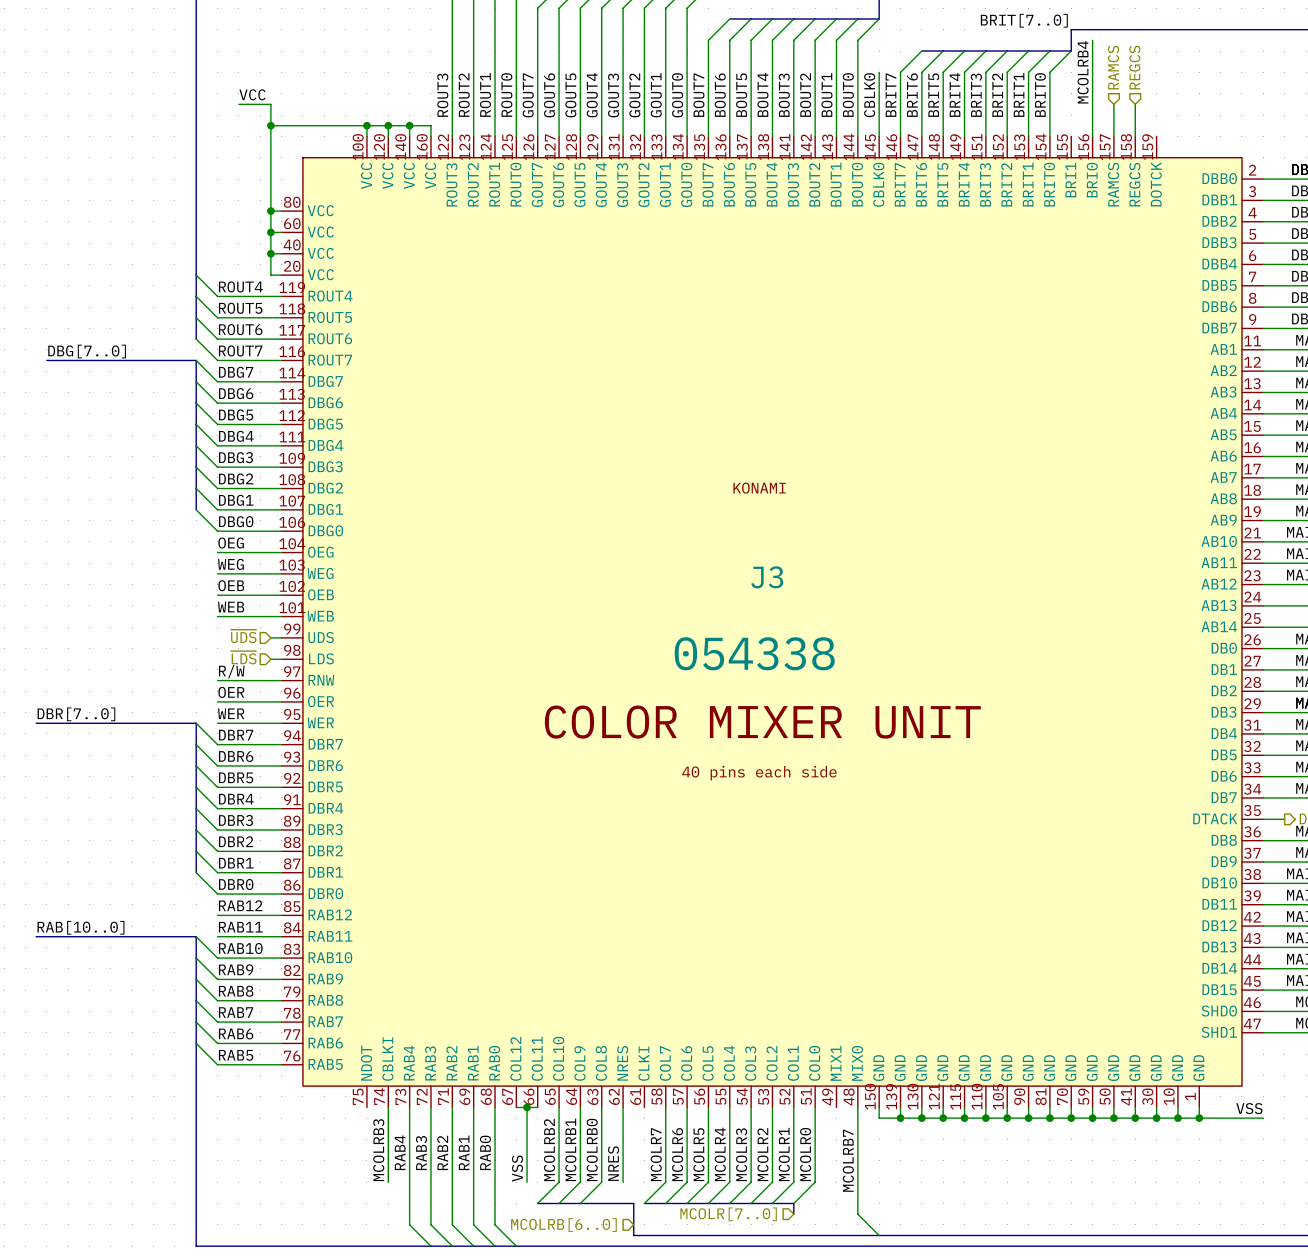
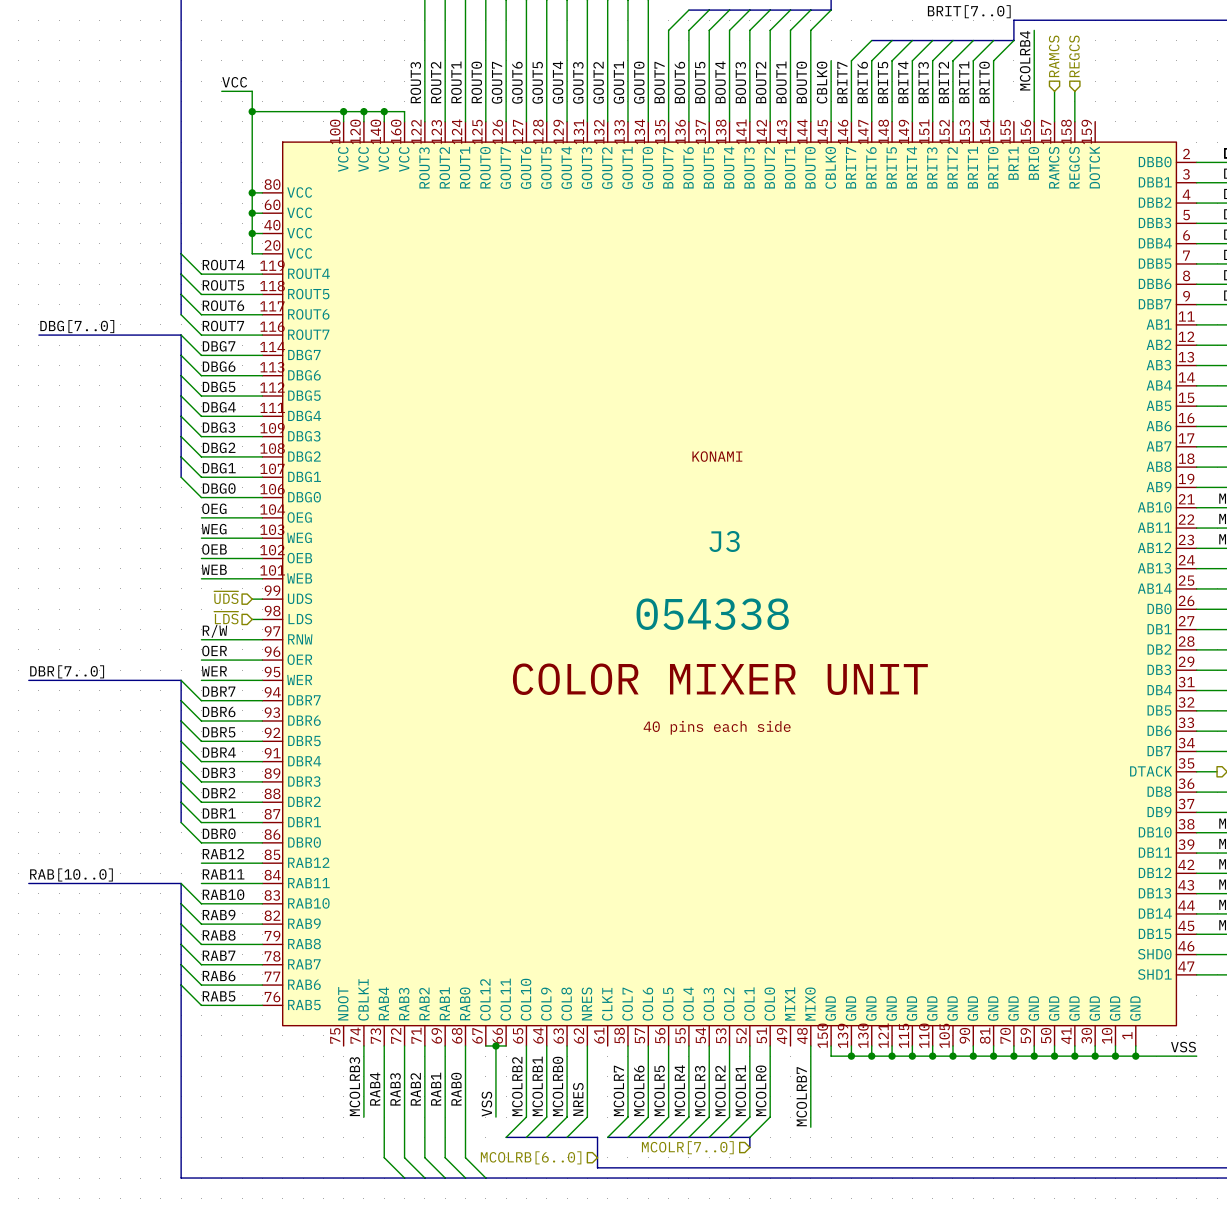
wire: none -> (587, 1117) (567, 1137)
wire: (857, 1192) (857, 1214) (879, 1235) -> none

